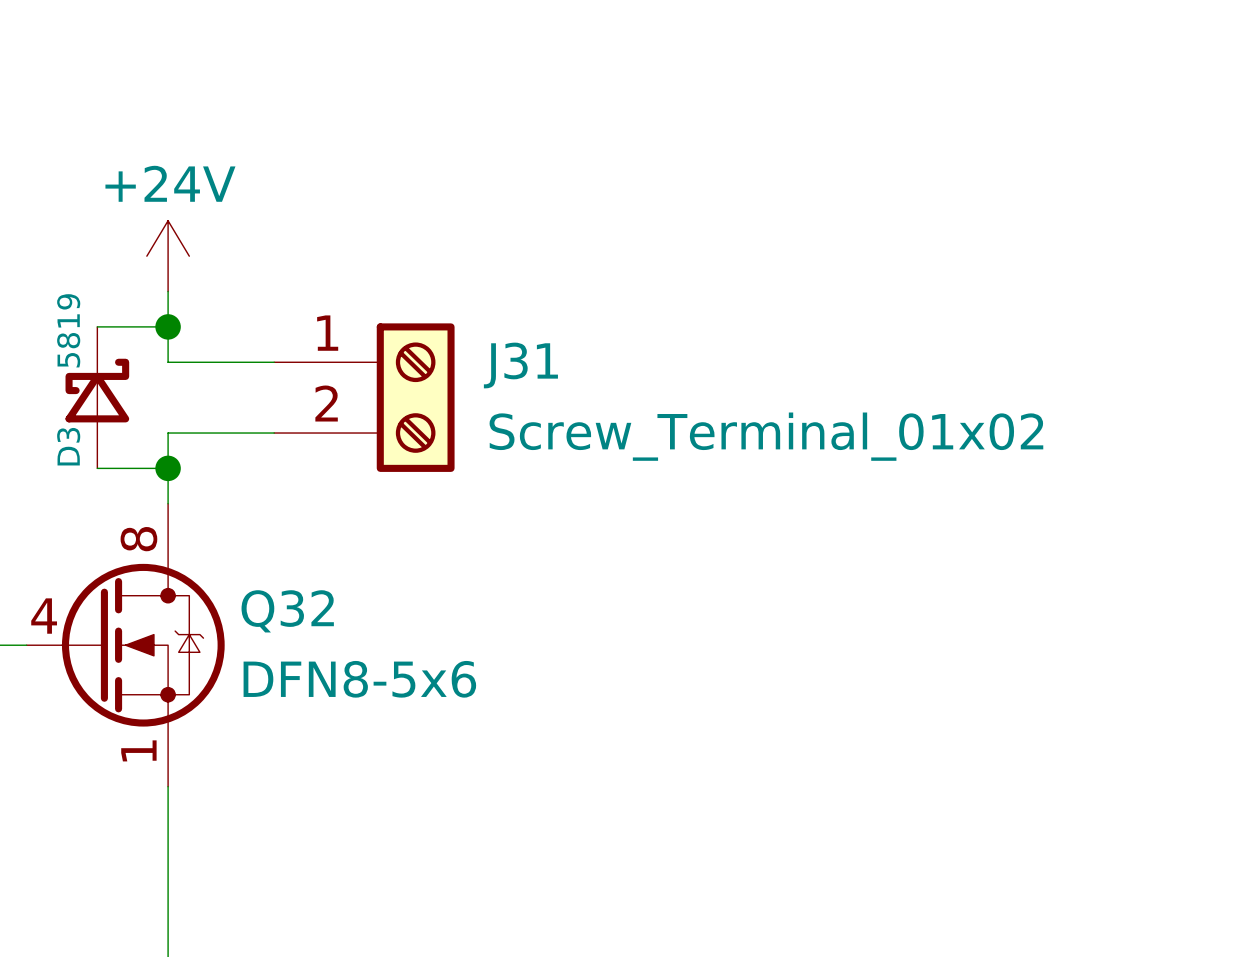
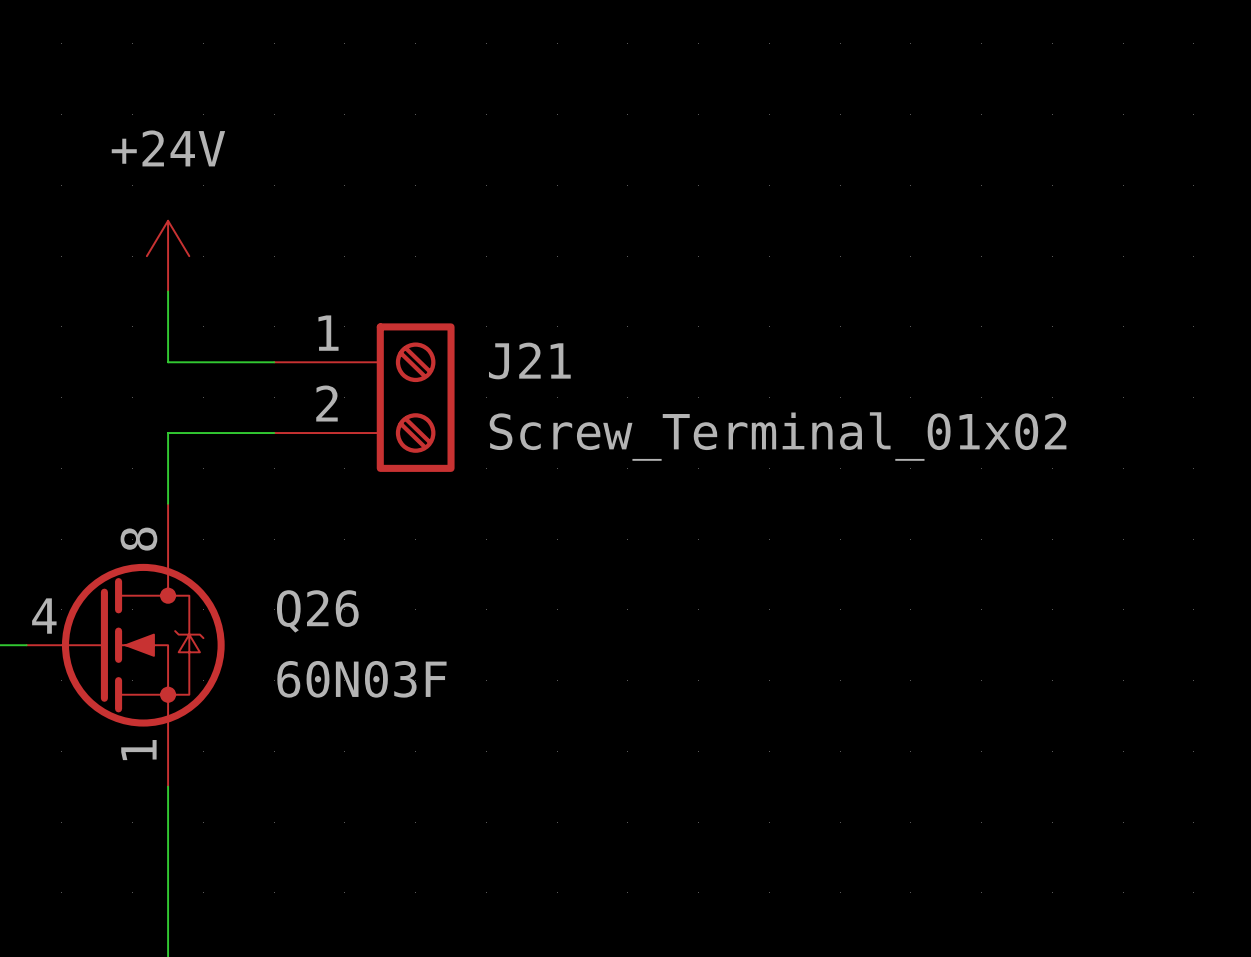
power symbol text position: +24V (170, 183) -> +24V (168, 148)
wire: (97, 326) (168, 326) -> none
junction: (168, 326) -> none
J31 name: J31 (520, 365) -> J21 (529, 360)
D3: 5819 (97, 397) -> none
wire: (97, 468) (168, 468) -> none
junction: (168, 468) -> none
Q32 name: Q32 (287, 611) -> Q26 (317, 611)
Q32 value: DFN8-5x6 (359, 679) -> 60N03F (361, 679)

